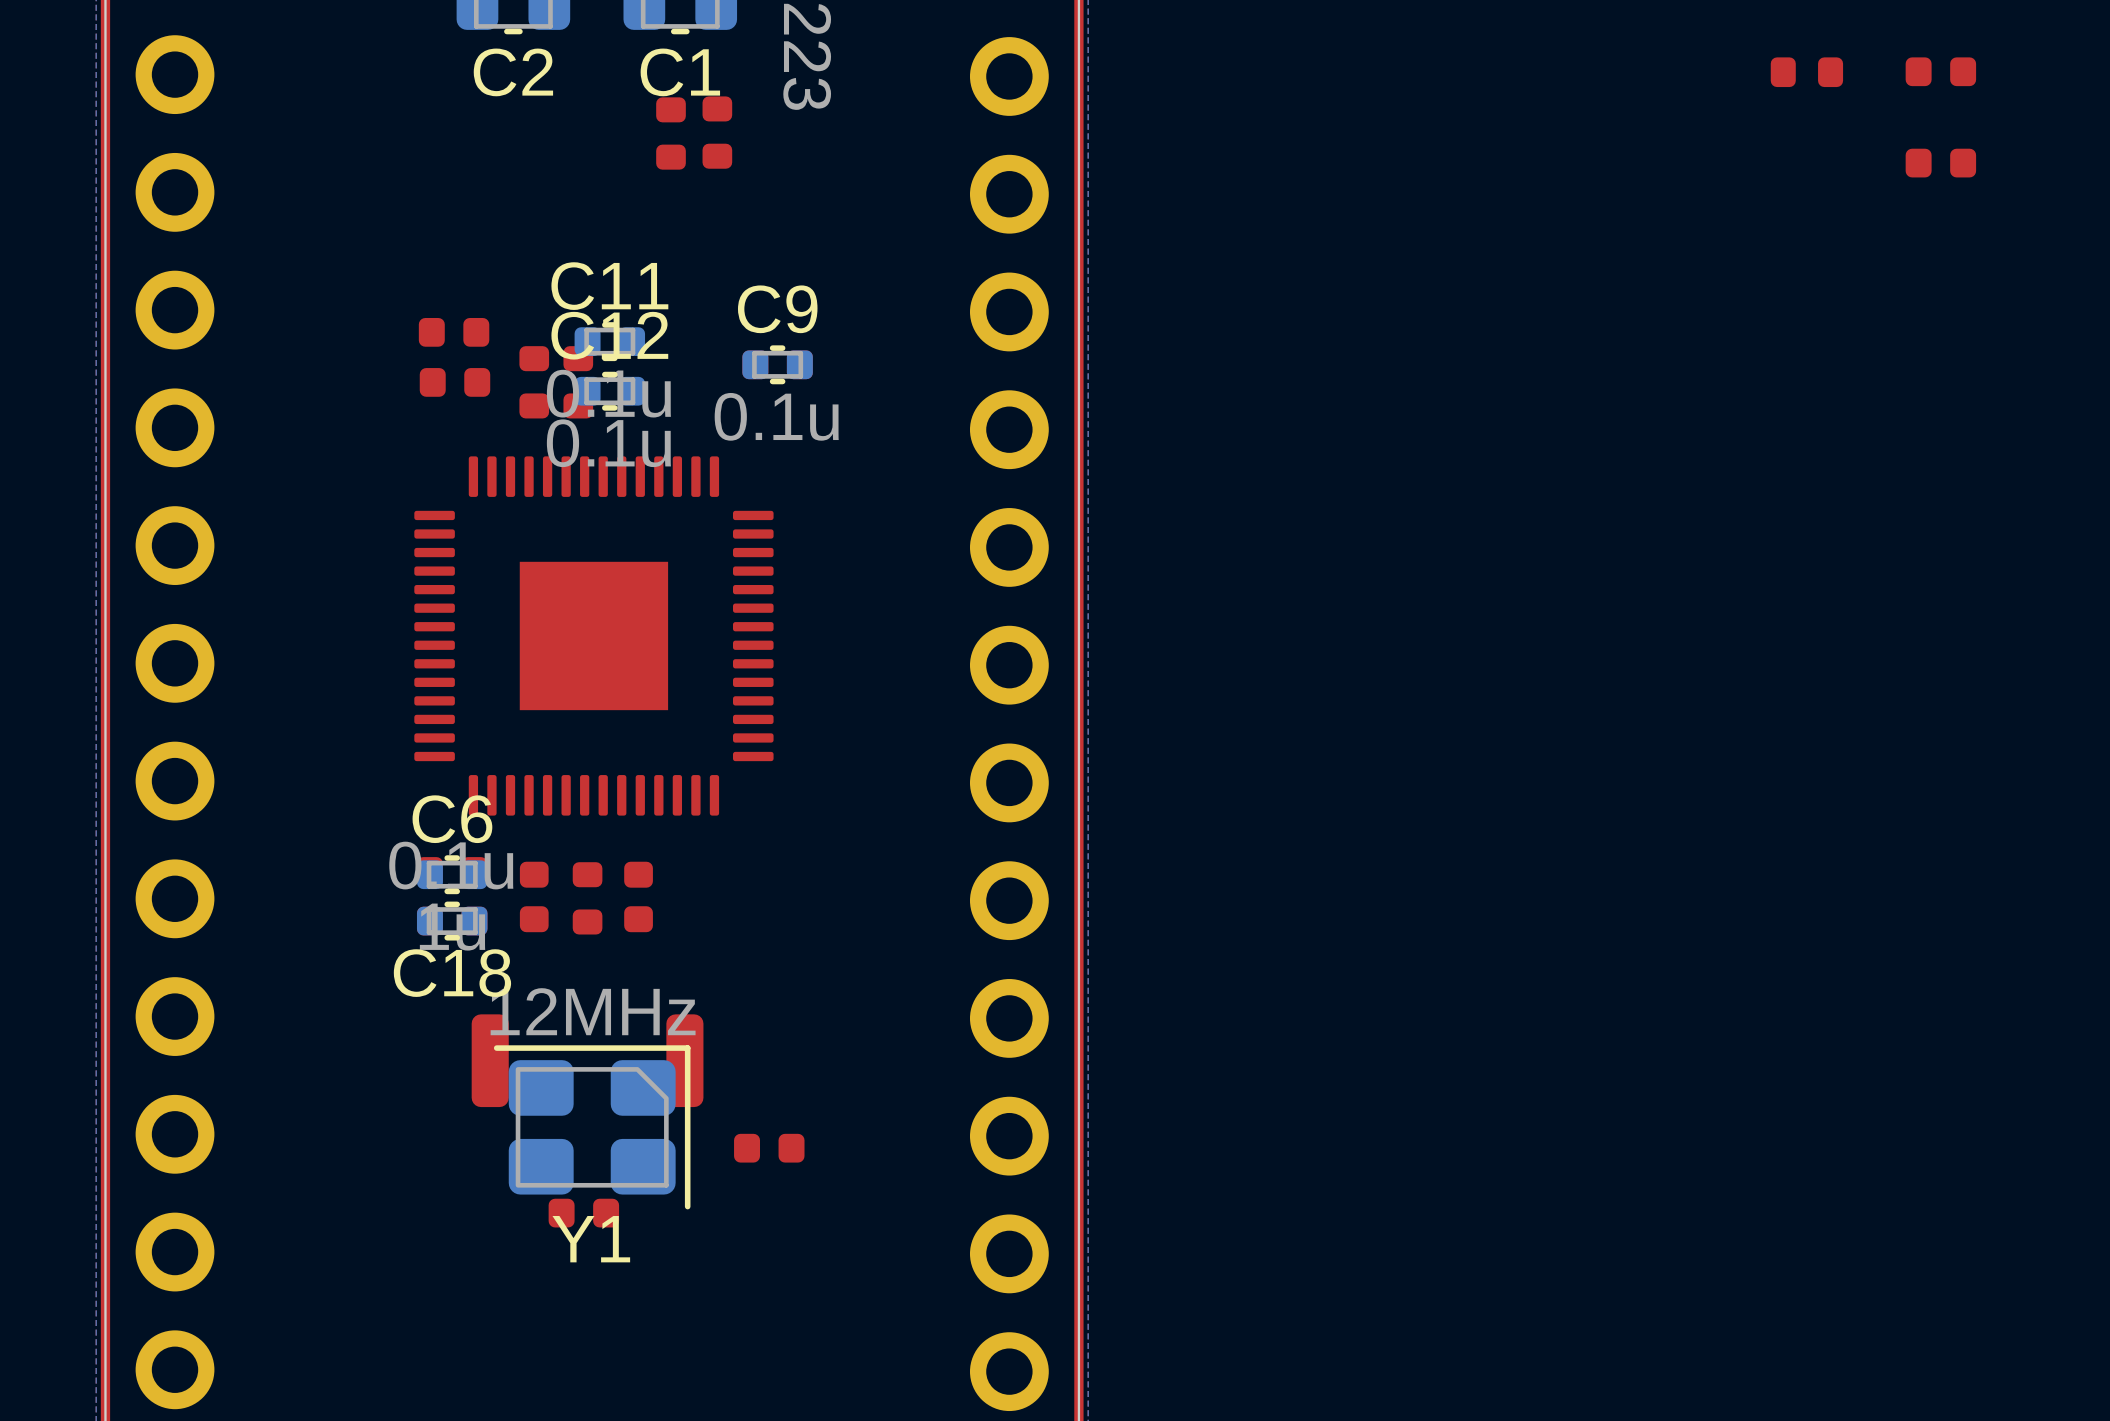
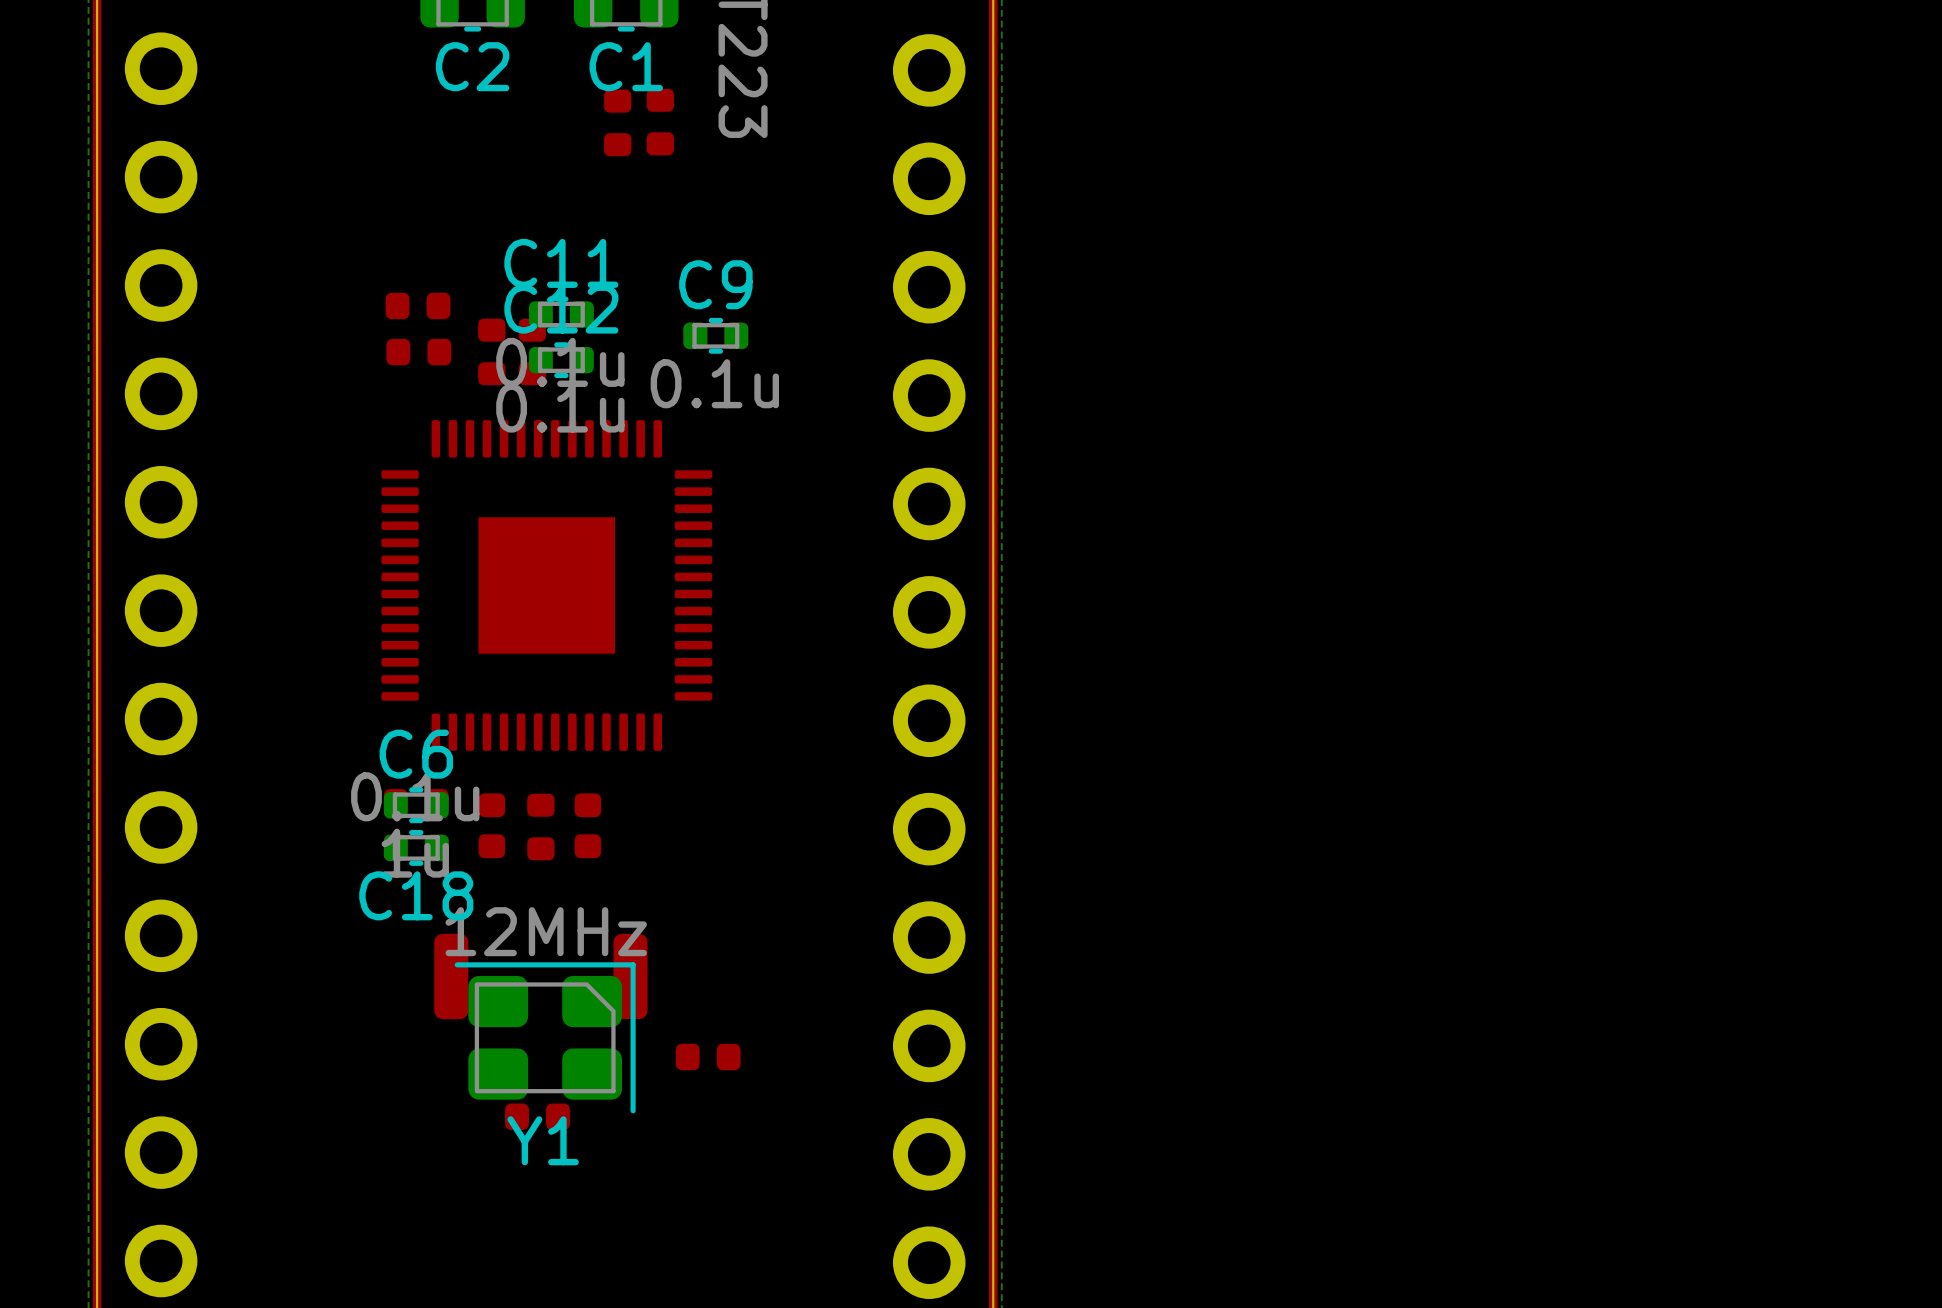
part: (1940, 71) -> none
part: (1806, 72) -> none
part: (1940, 163) -> none

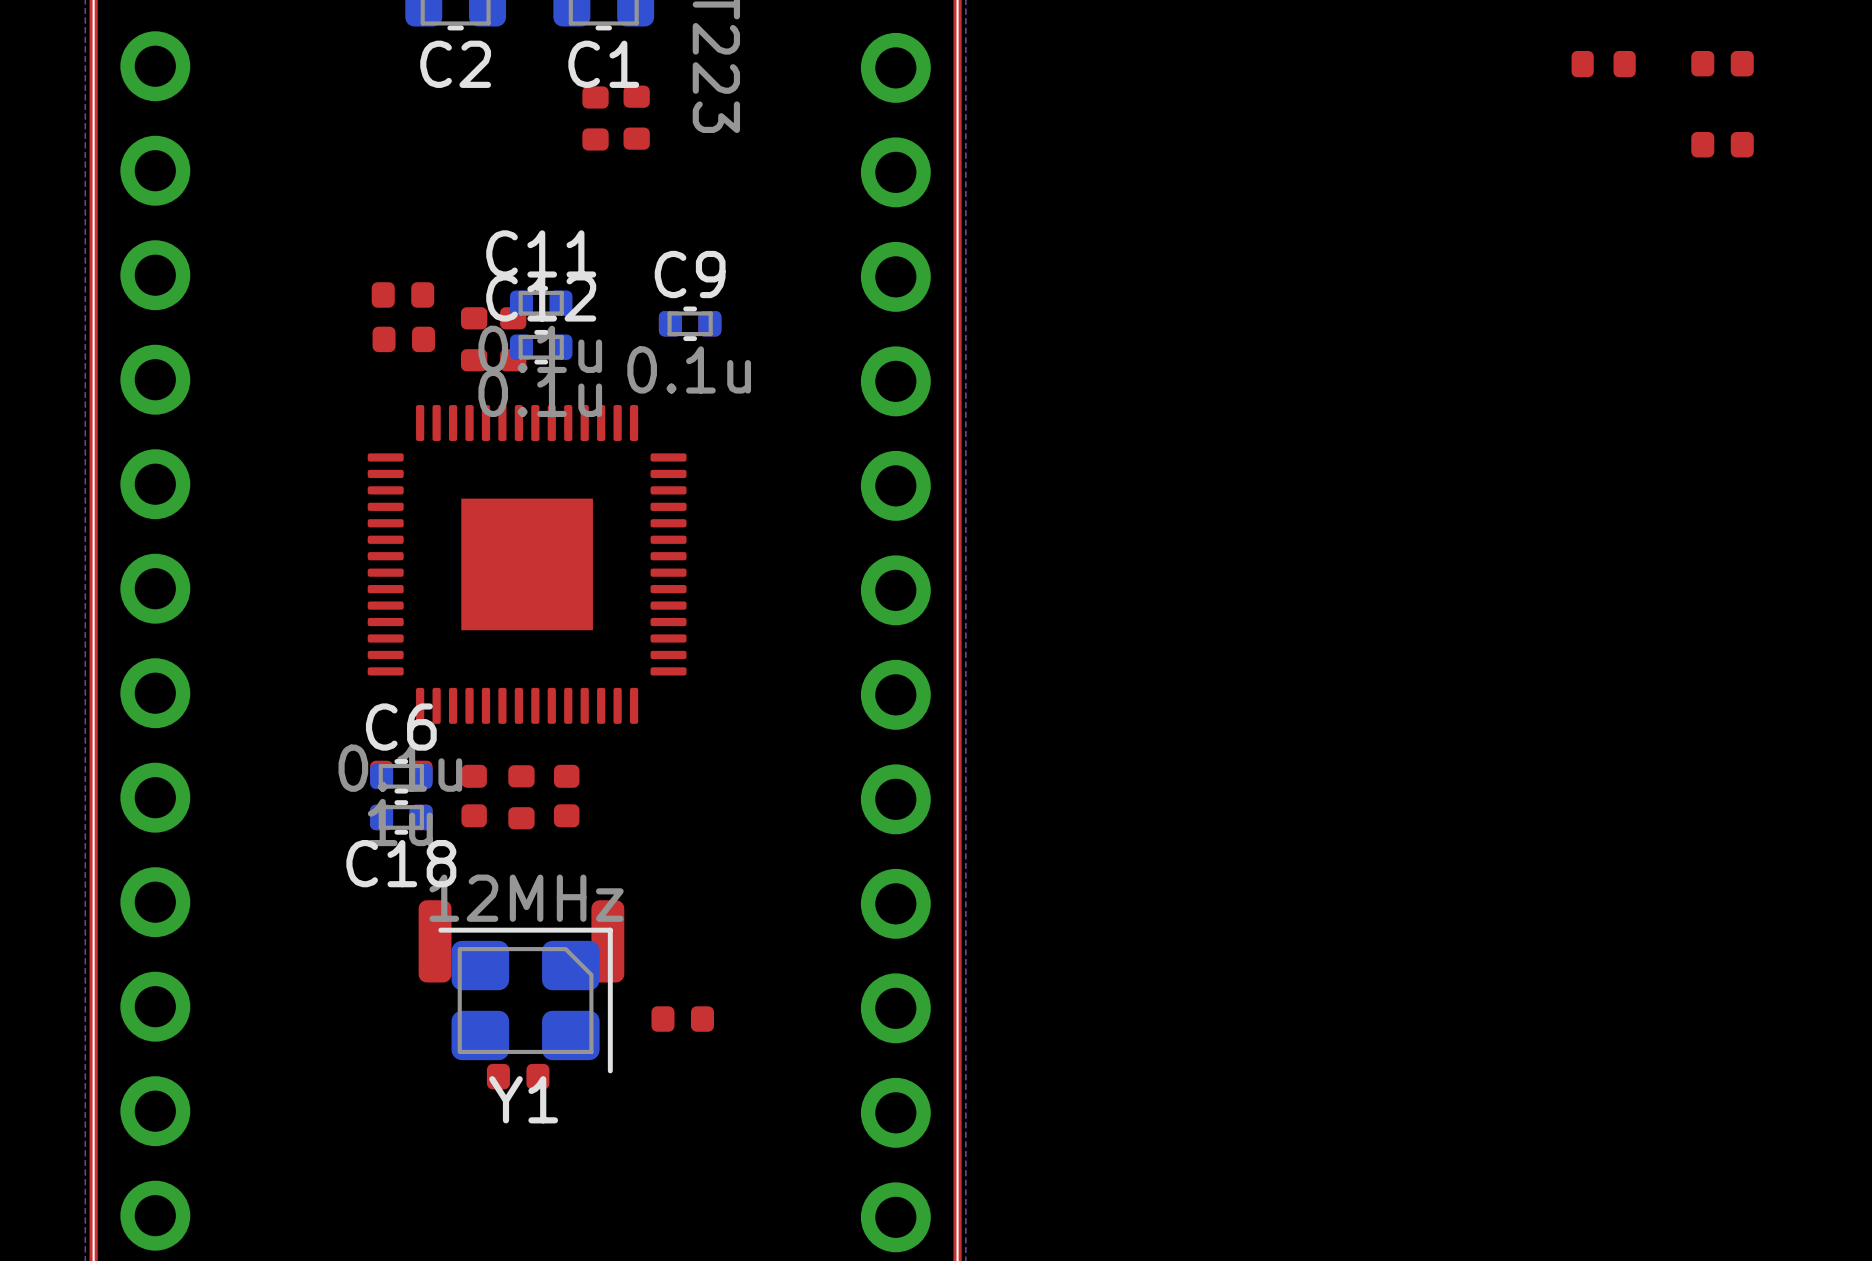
part: none -> (1603, 64)
part: none -> (1722, 63)
part: none -> (1722, 144)

